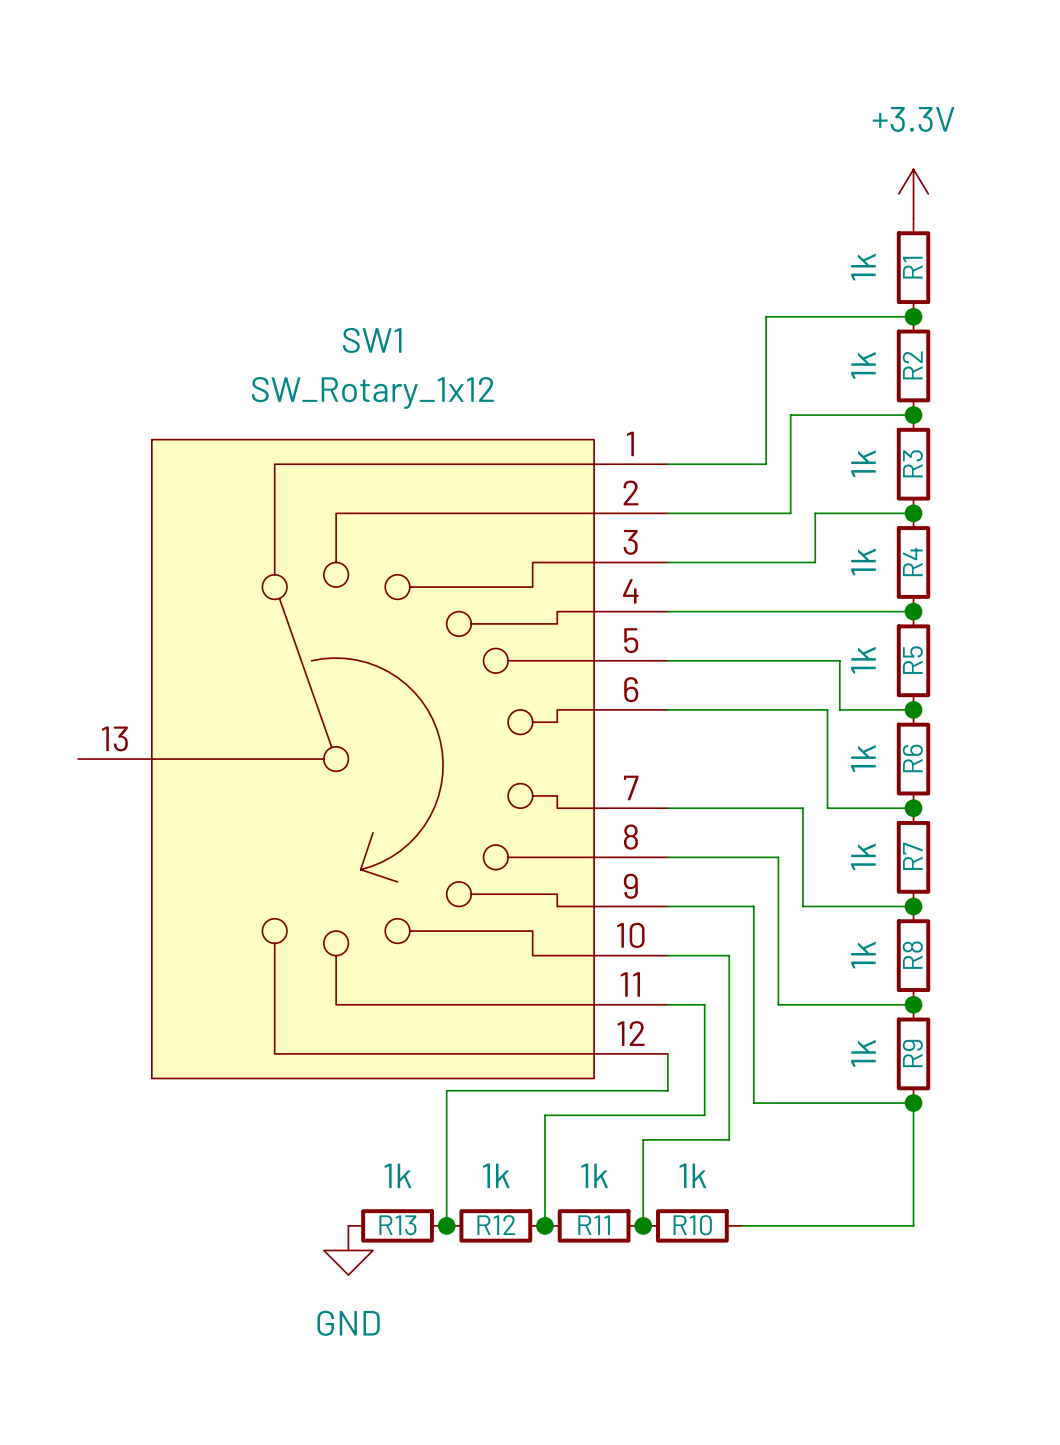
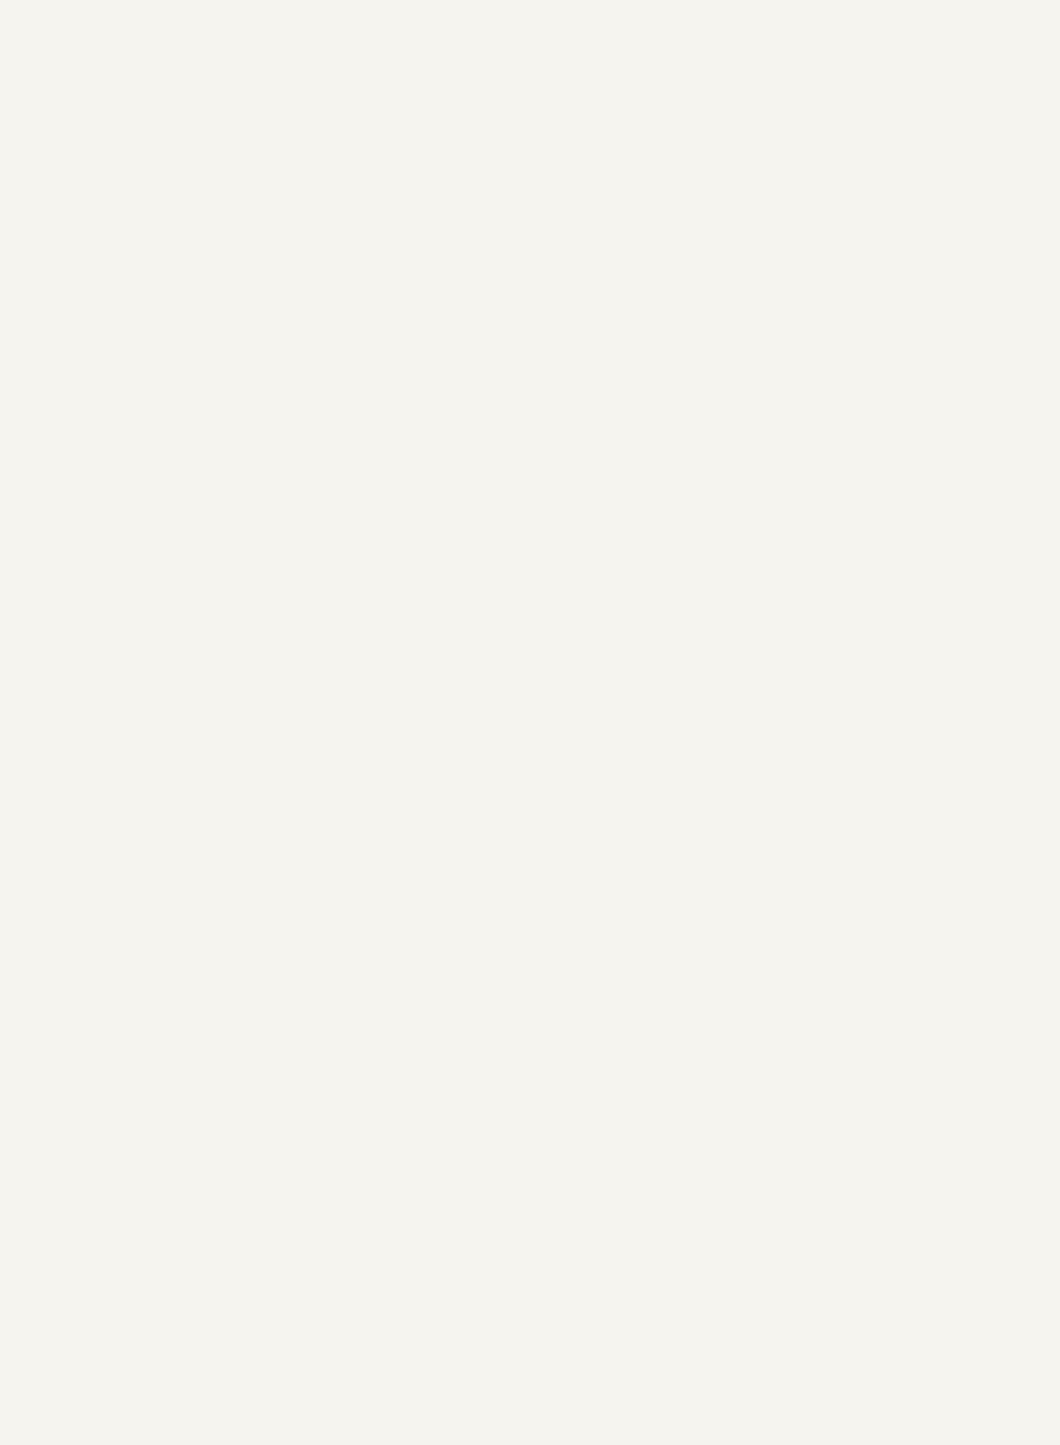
power symbol: +3.3V (913, 193) -> none
R1: 1k (913, 267) -> none
wire: (913, 316) (766, 316) (766, 464) (667, 464) -> none
junction: (913, 316) -> none
R2: 1k (913, 365) -> none
wire: (913, 415) (790, 415) (790, 513) (667, 513) -> none
junction: (913, 415) -> none
R3: 1k (913, 464) -> none
wire: (913, 513) (815, 513) (815, 562) (667, 562) -> none
junction: (913, 513) -> none
R4: 1k (913, 562) -> none
wire: (667, 611) (913, 611) -> none
junction: (913, 611) -> none
wire: (667, 660) (839, 660) (839, 709) (913, 709) -> none
R5: 1k (913, 660) -> none
wire: (667, 709) (827, 709) (827, 808) (913, 808) -> none
junction: (913, 709) -> none
SW1: SW_Rotary_1x12 (372, 759) -> none
R6: 1k (913, 759) -> none
wire: (667, 808) (802, 808) (802, 906) (913, 906) -> none
junction: (913, 808) -> none
wire: (667, 857) (778, 857) (778, 1004) (913, 1004) -> none
R7: 1k (913, 857) -> none
wire: (667, 906) (753, 906) (753, 1103) (913, 1103) (913, 1225) (741, 1225) -> none
junction: (913, 906) -> none
wire: (667, 955) (729, 955) (729, 1139) (643, 1139) (643, 1225) -> none
R8: 1k (913, 955) -> none
wire: (667, 1004) (704, 1004) (704, 1115) (544, 1115) (544, 1225) -> none
junction: (913, 1004) -> none
wire: (667, 1053) (667, 1090) (446, 1090) (446, 1225) -> none
R9: 1k (913, 1053) -> none
junction: (913, 1103) -> none
R13: 1k (397, 1225) -> none
junction: (446, 1225) -> none
R12: 1k (495, 1225) -> none
junction: (544, 1225) -> none
R11: 1k (594, 1225) -> none
junction: (643, 1225) -> none
R10: 1k (692, 1225) -> none
power symbol: GND (348, 1250) -> none

